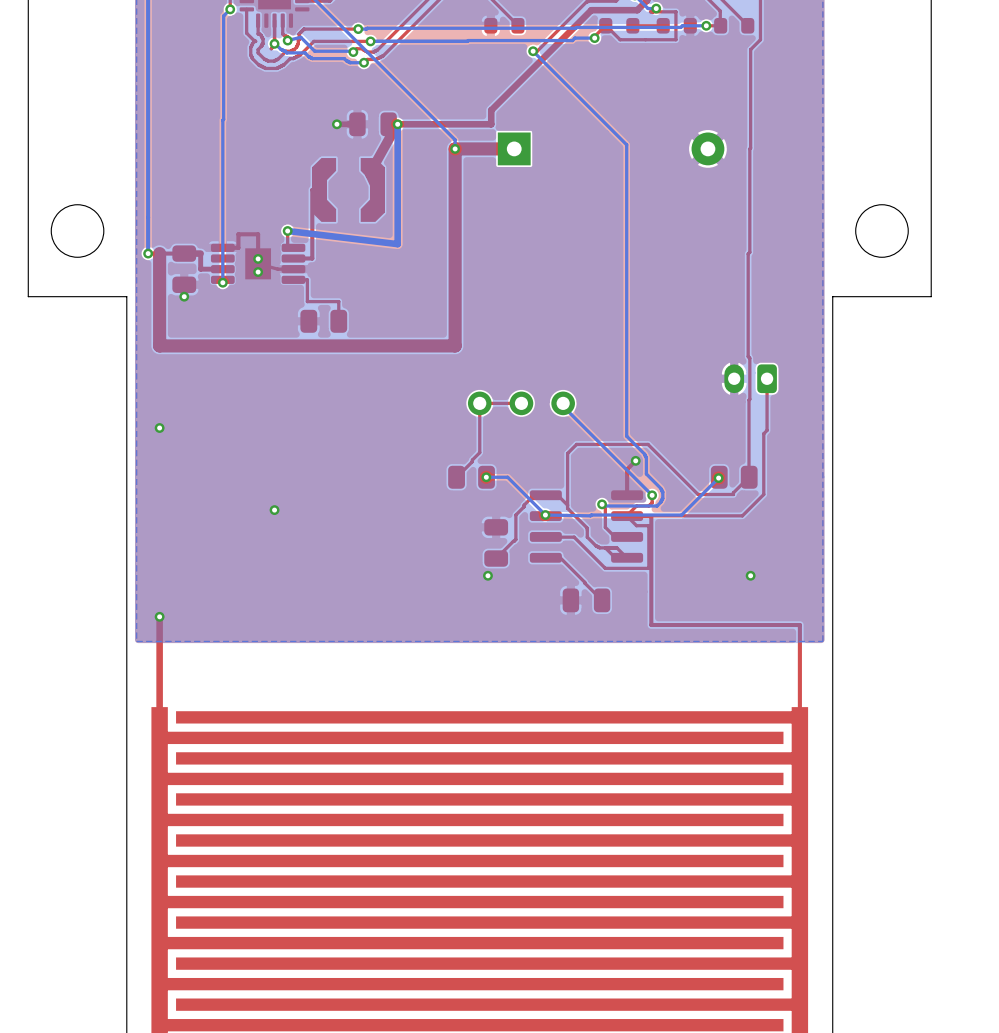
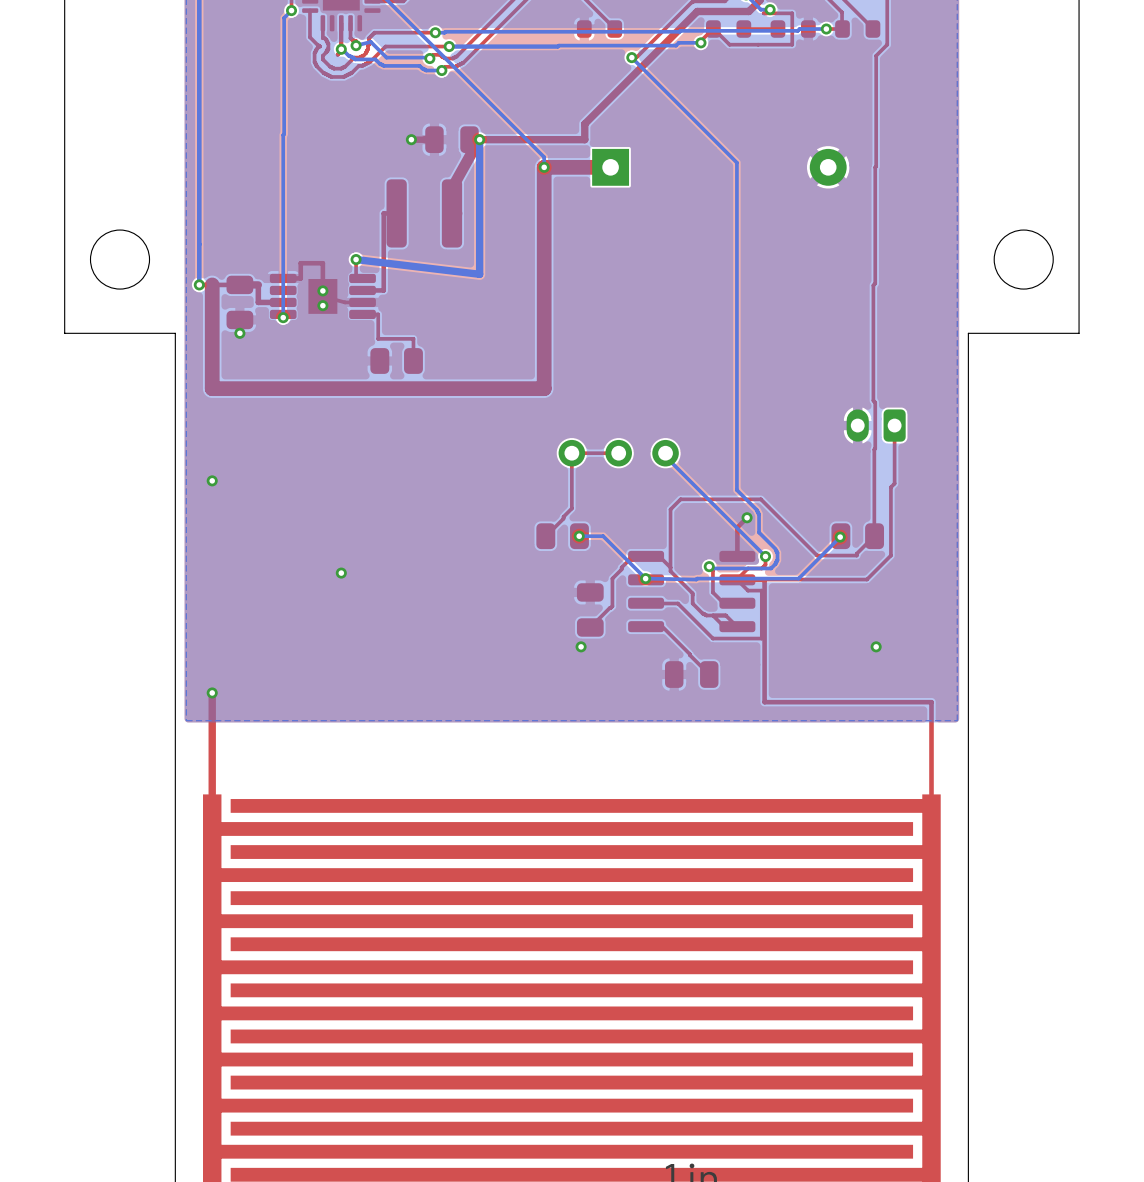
part footprint: [312, 158, 385, 222] -> [386, 179, 463, 248]

